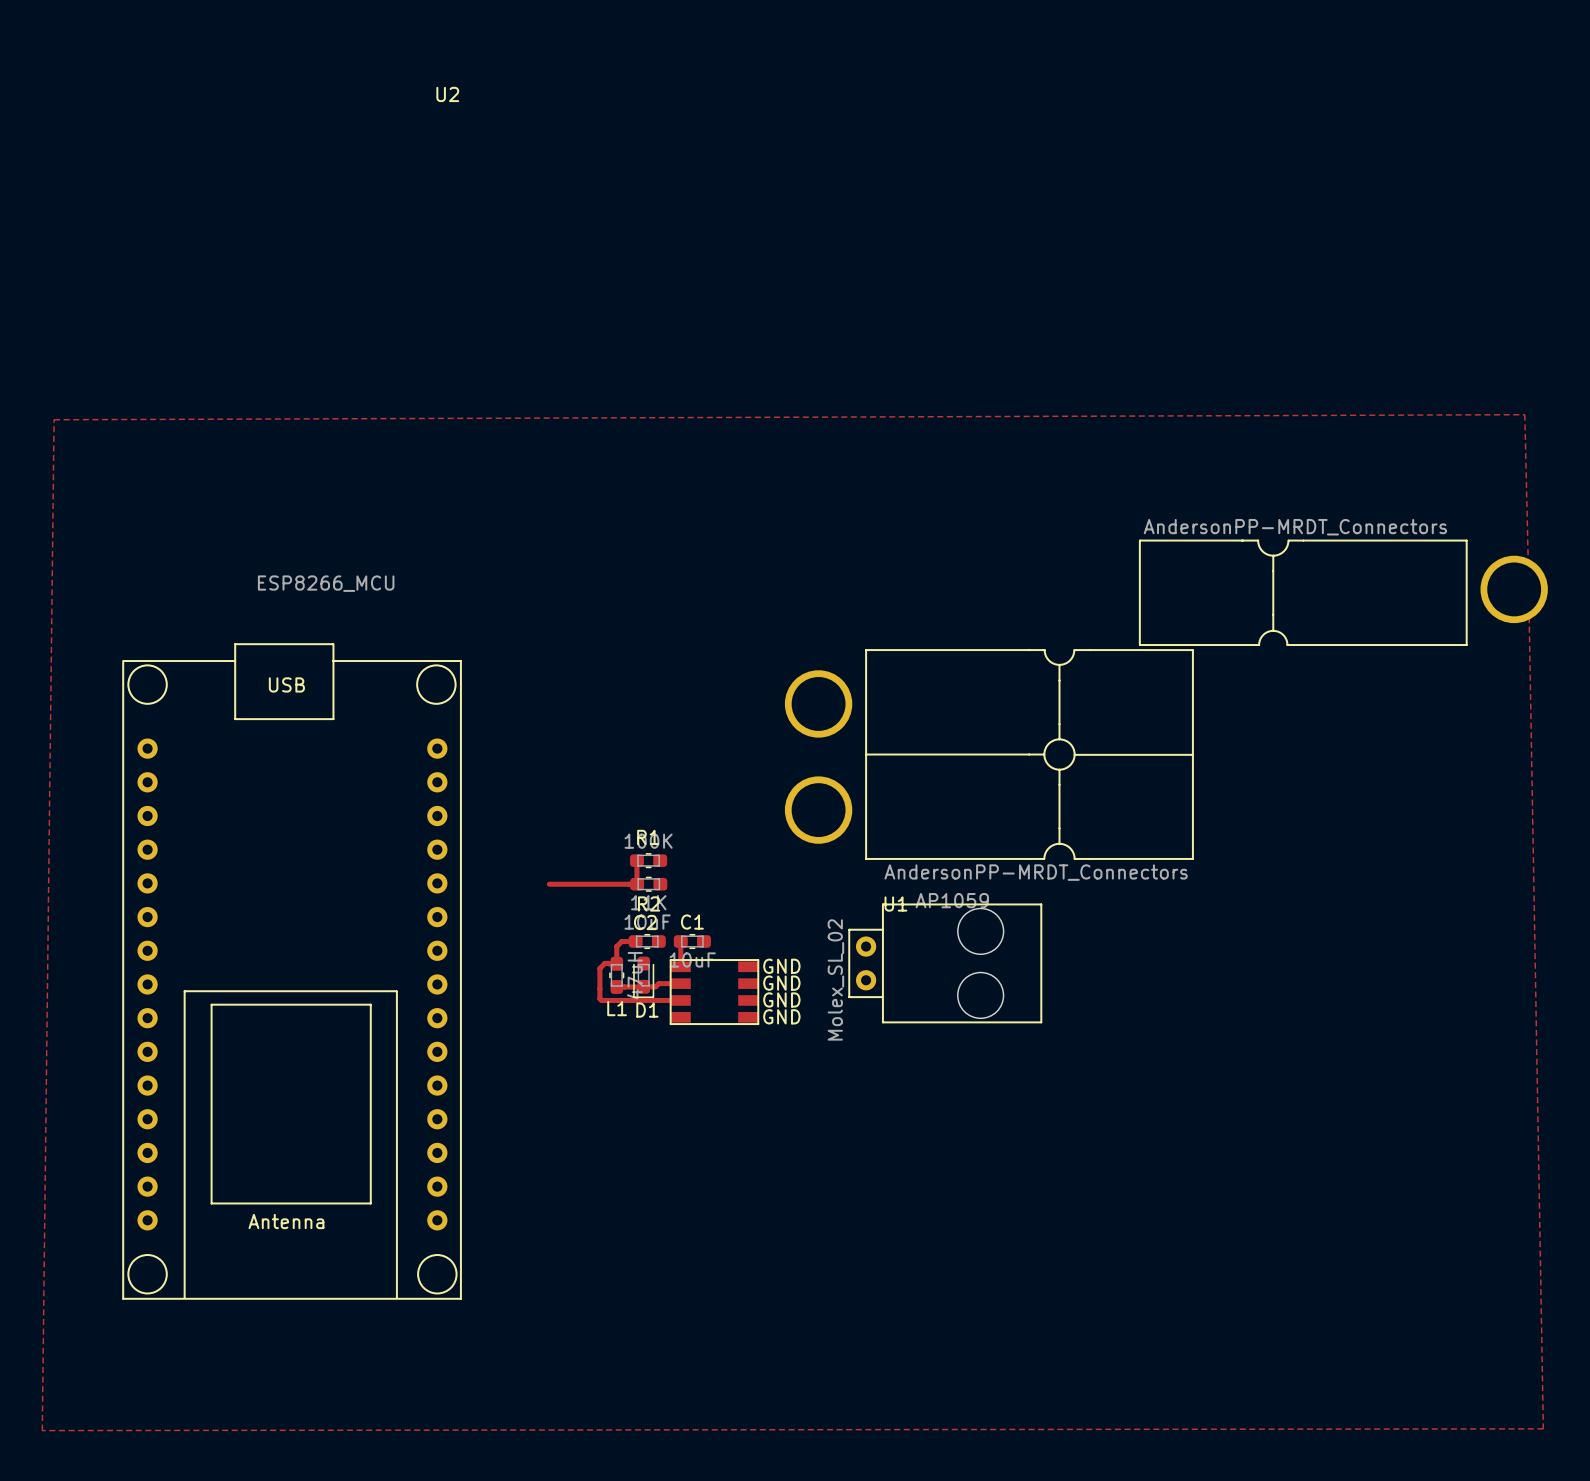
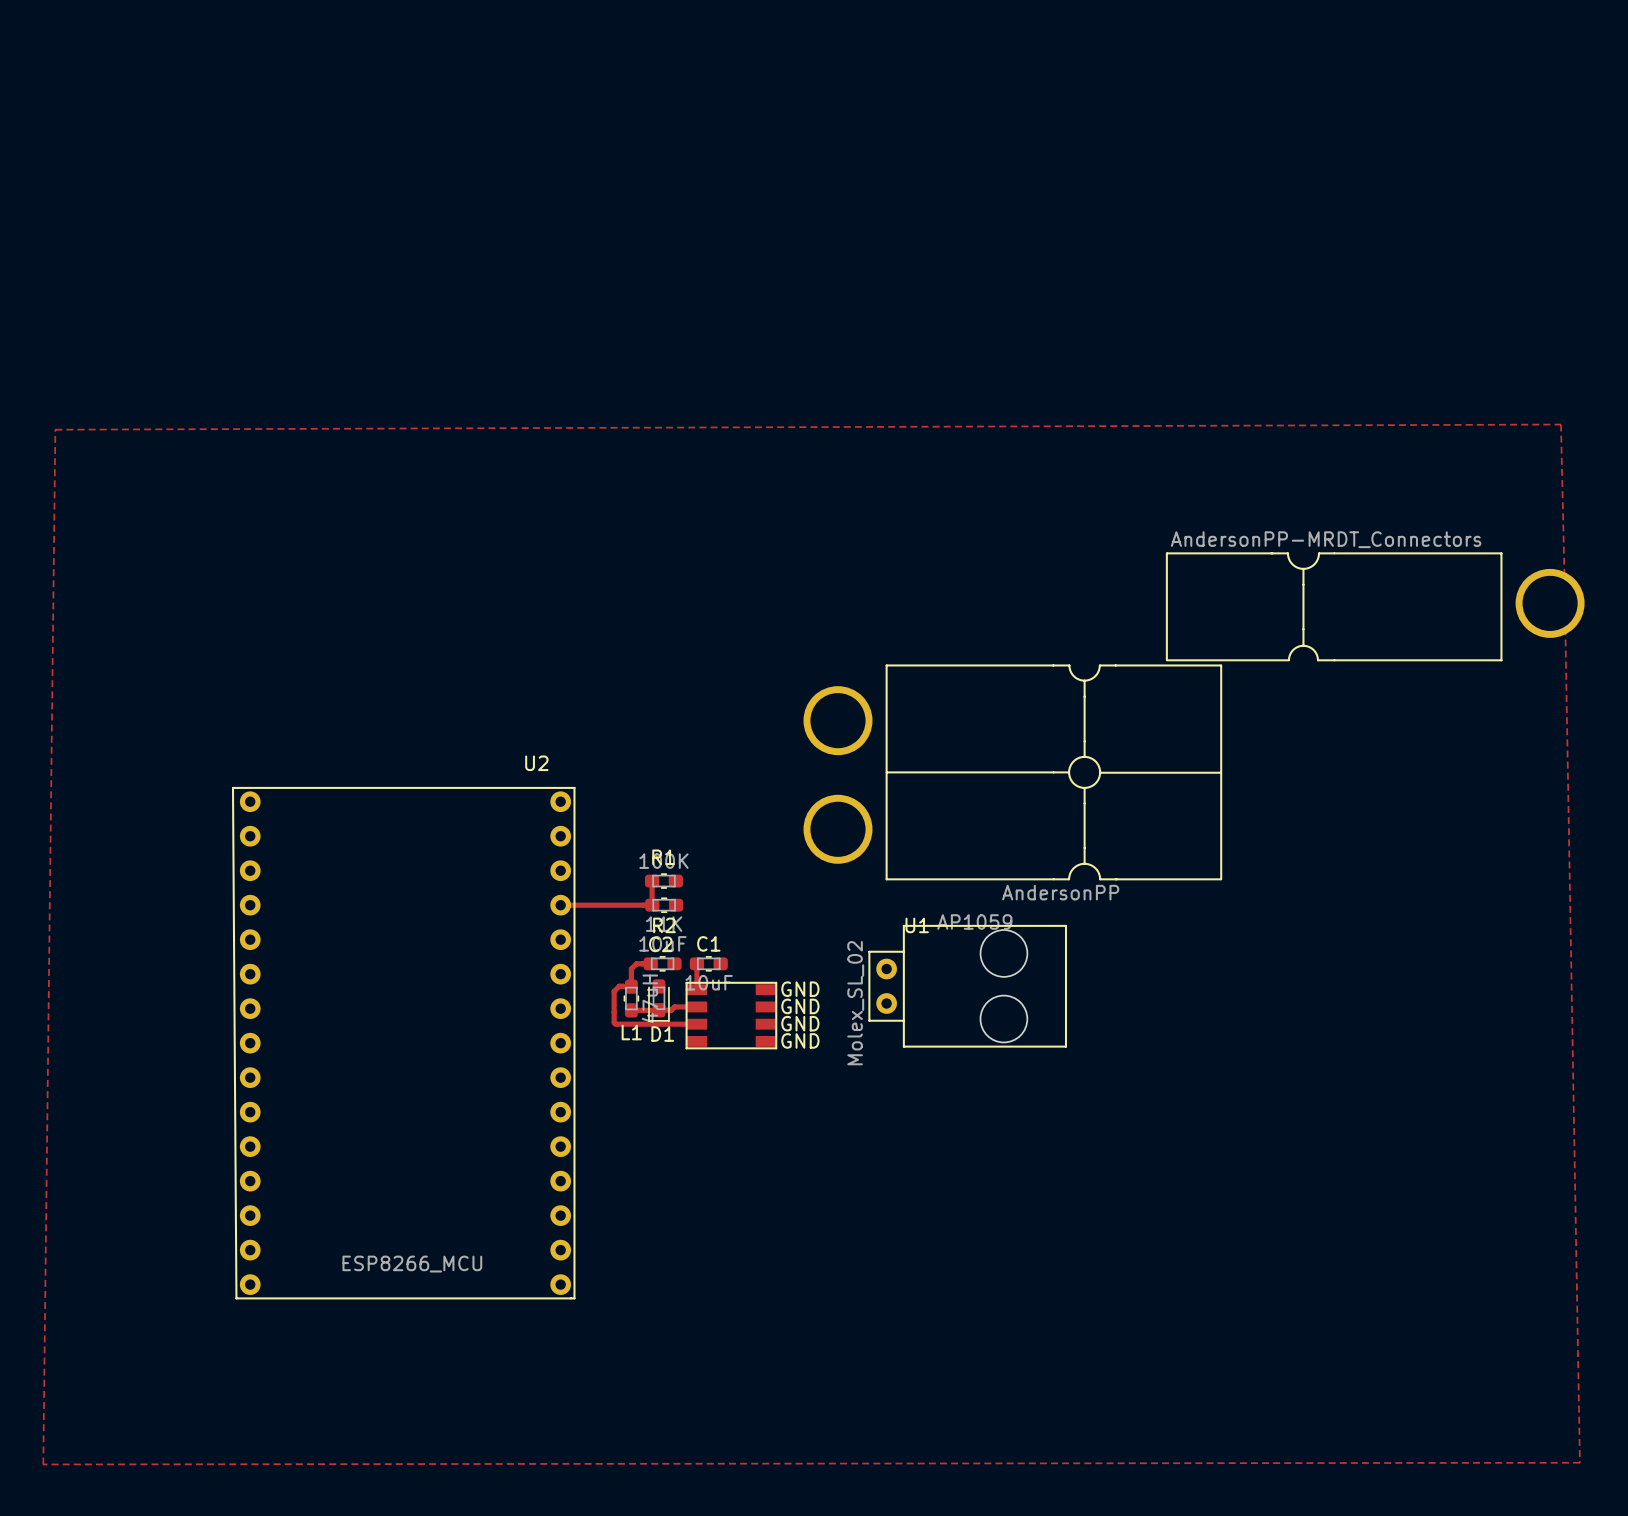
U2 name position: U2 (447, 94) -> U2 (536, 763)
U2 value position: ESP8266_MCU (326, 583) -> ESP8266_MCU (412, 1264)
U2 footprint: [122, 643, 462, 1300] -> [231, 786, 576, 1300]
part value: AndersonPP-MRDT_Connectors (1036, 872) -> AndersonPP (1060, 892)

